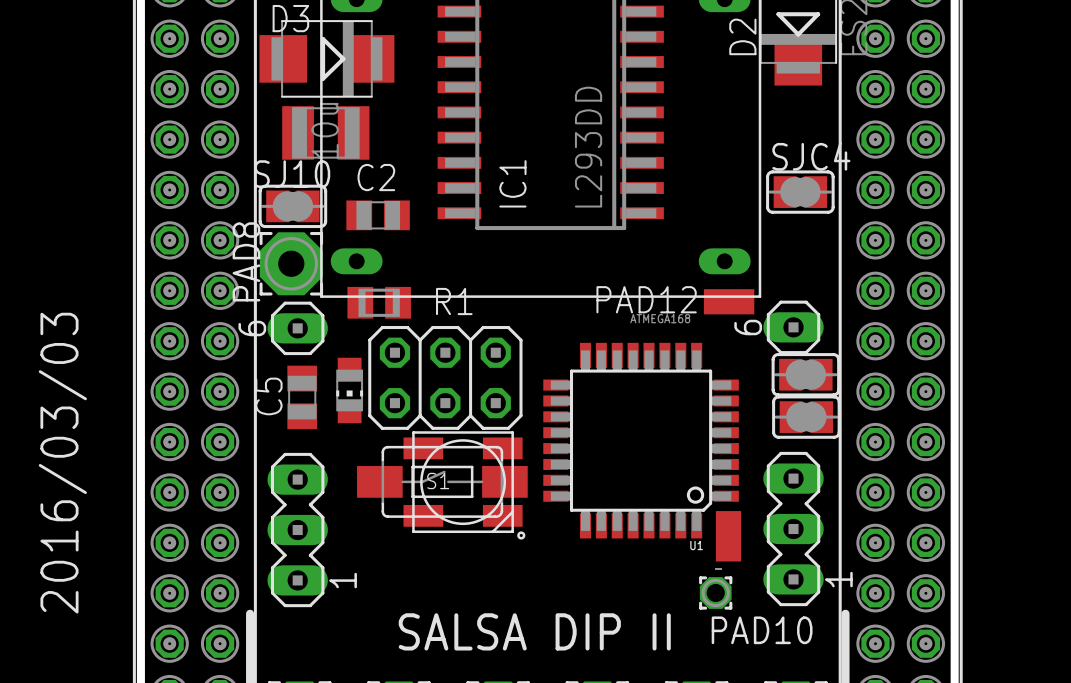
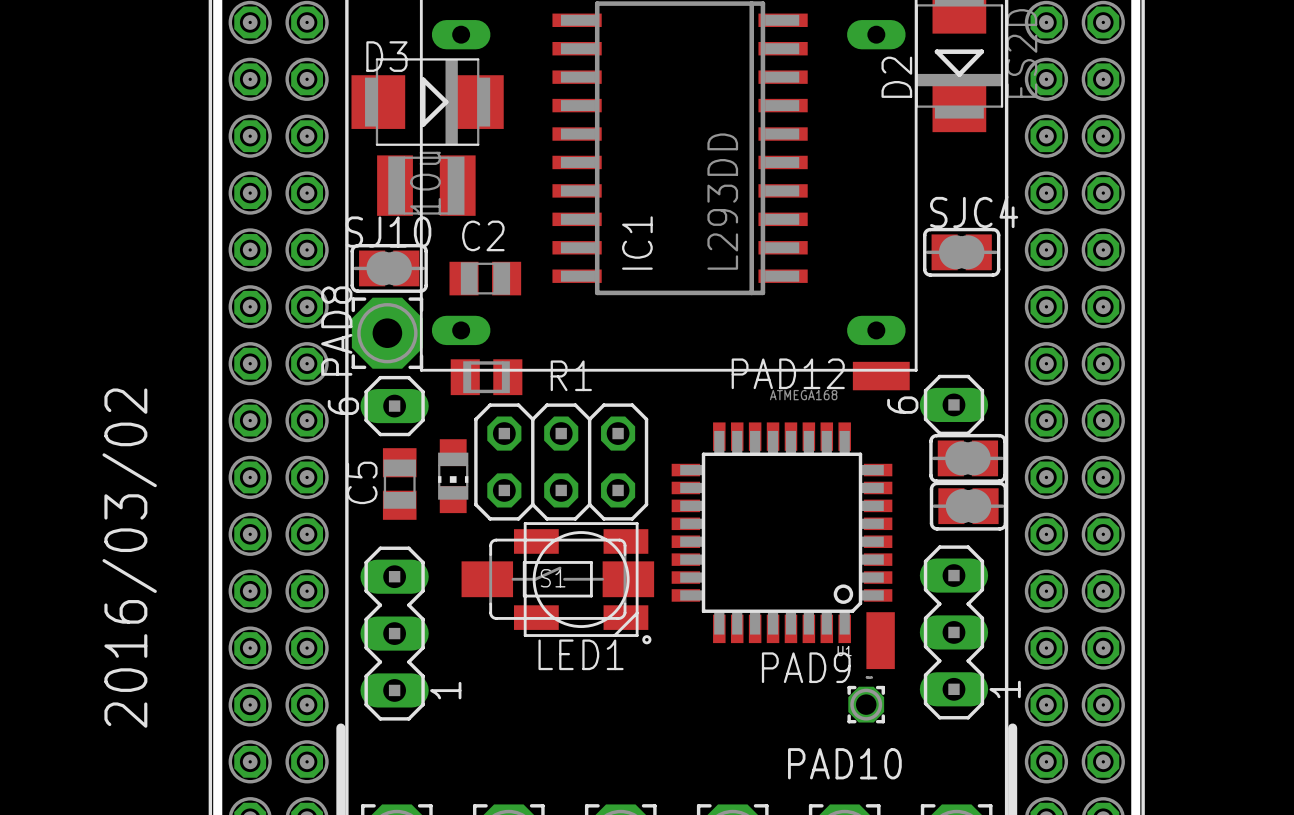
text: 2016/03/03 (62, 463) -> 2016/03/02 (129, 558)
LED1 name: none -> LED1 (581, 654)
PAD9 name: none -> PAD9 (806, 667)
PAD10 name position: PAD10 (762, 630) -> PAD10 (844, 763)
text: SALSA DIP II (534, 631) -> none

